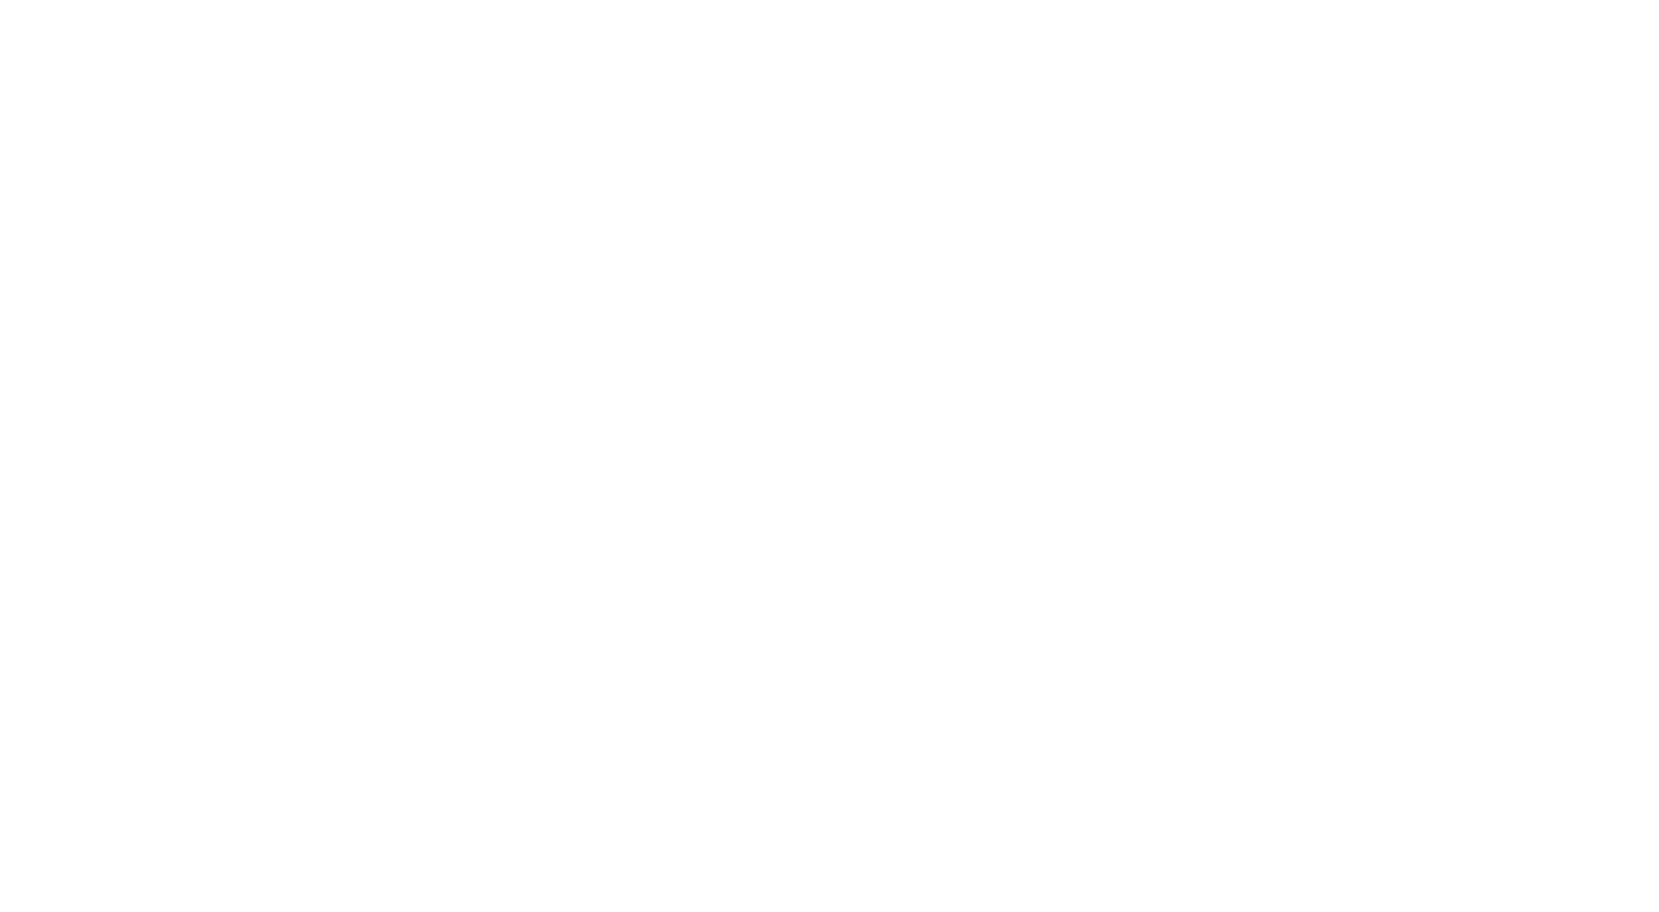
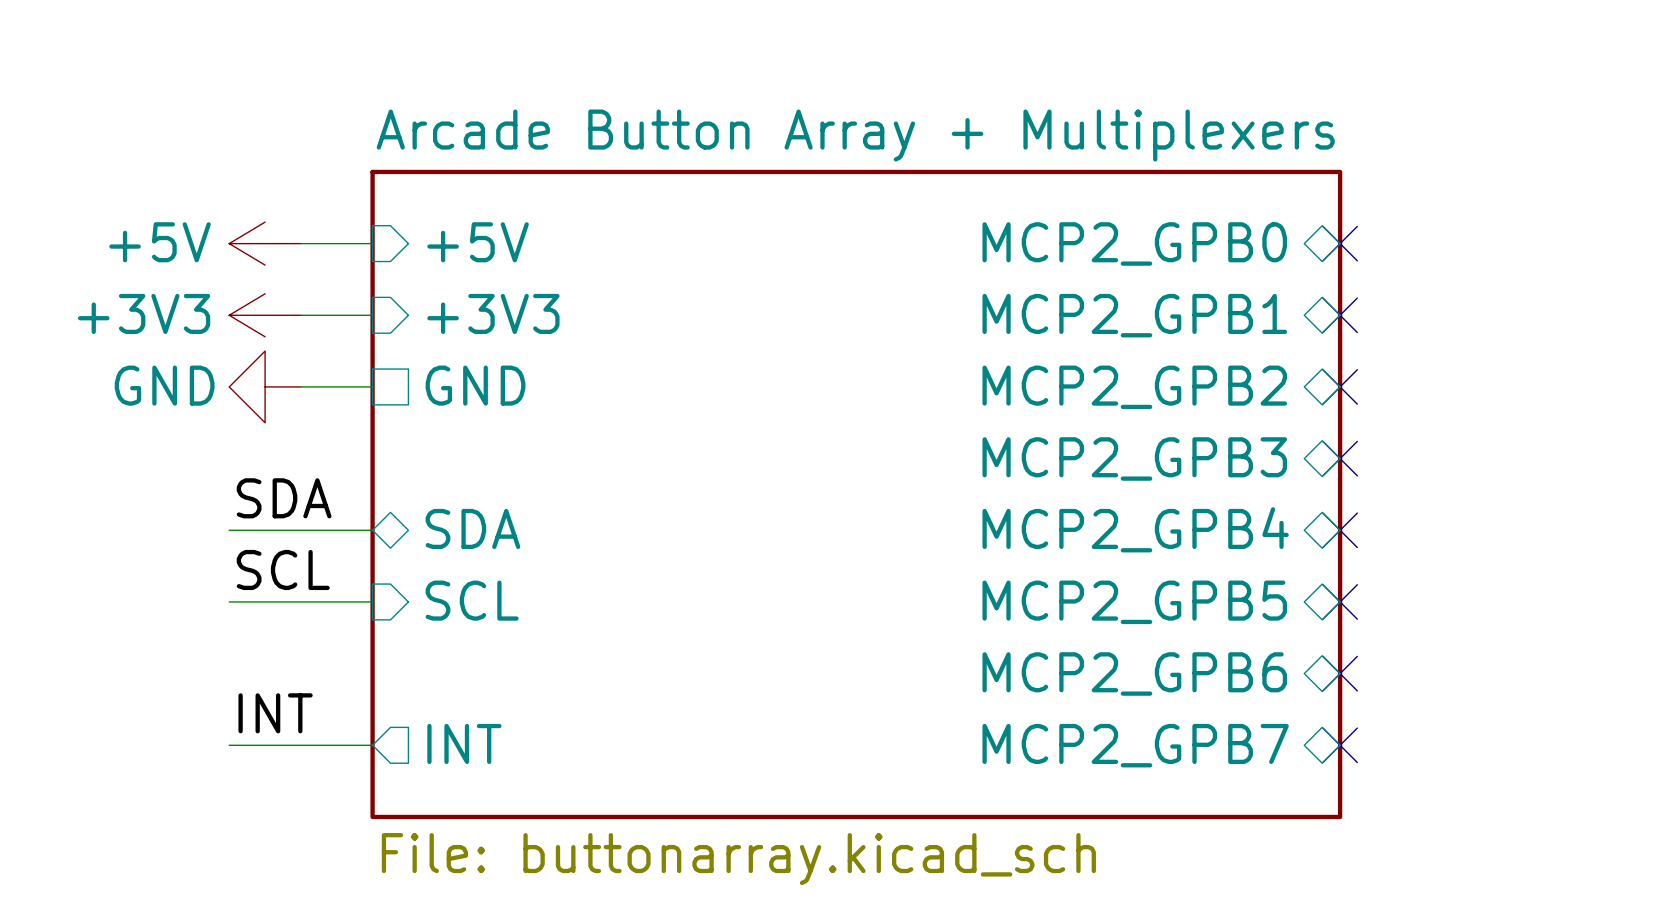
sheet pin: none -> +5V (478, 242)
power symbol: none -> +5V (265, 243)
wire: none -> (300, 243) (372, 243)
sheet pin: none -> MCP2_GPB0 (1134, 243)
no-connect mark: none -> (1340, 243)
sheet pin: none -> +3V3 (493, 313)
power symbol: none -> +3V3 (265, 315)
wire: none -> (300, 315) (372, 315)
sheet pin: none -> MCP2_GPB1 (1134, 315)
no-connect mark: none -> (1340, 315)
sheet pin: none -> GND (475, 385)
power symbol: none -> GND (265, 386)
wire: none -> (300, 386) (372, 386)
no-connect mark: none -> (1340, 386)
sheet pin: none -> MCP2_GPB2 (1134, 387)
sheet pin: none -> MCP2_GPB3 (1134, 458)
no-connect mark: none -> (1340, 458)
sheet Arcade Button Array + Multiplexers: none -> File: buttonarray.kicad_sch (856, 494)
label: none -> SDA (284, 498)
sheet pin: none -> SDA (472, 528)
sheet pin: none -> MCP2_GPB4 (1135, 529)
wire: none -> (229, 530) (372, 530)
no-connect mark: none -> (1340, 530)
label: none -> SCL (283, 569)
sheet pin: none -> SCL (472, 600)
wire: none -> (229, 601) (372, 601)
no-connect mark: none -> (1340, 601)
sheet pin: none -> MCP2_GPB5 (1134, 602)
sheet pin: none -> MCP2_GPB6 (1134, 673)
no-connect mark: none -> (1340, 673)
label: none -> INT (275, 713)
sheet pin: none -> INT (464, 743)
wire: none -> (229, 745) (372, 745)
sheet pin: none -> MCP2_GPB7 (1135, 745)
no-connect mark: none -> (1340, 745)

